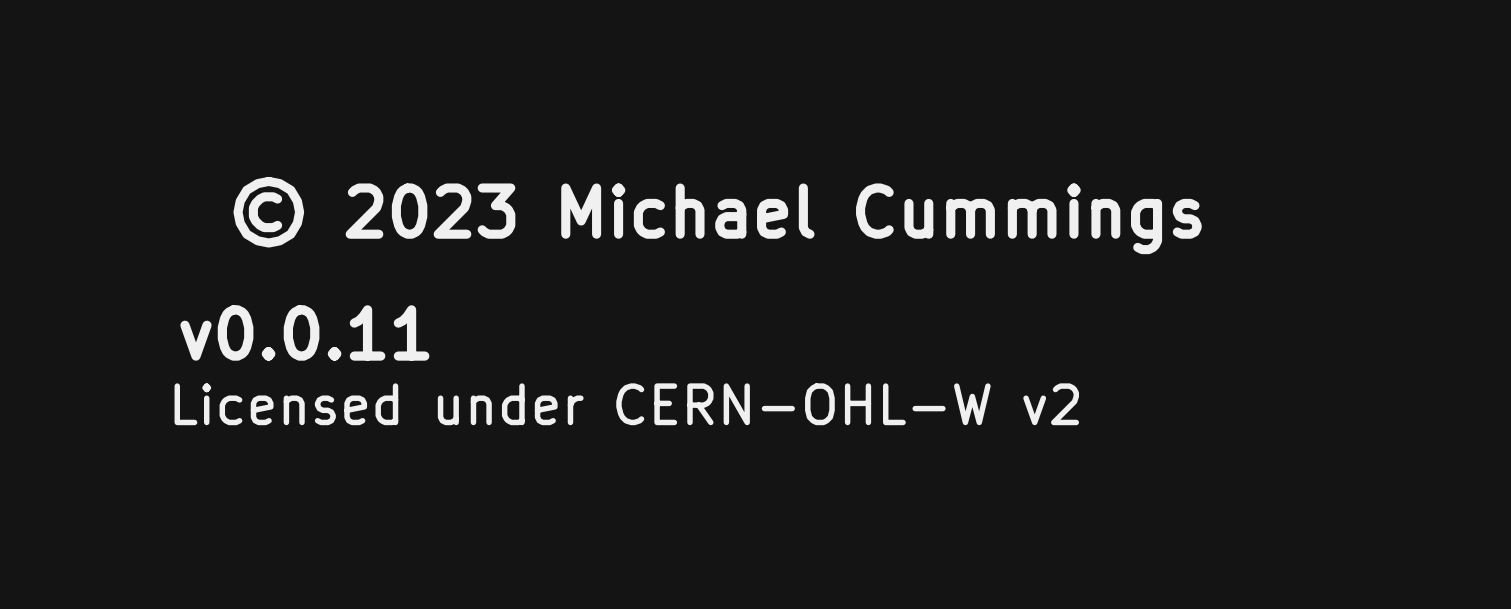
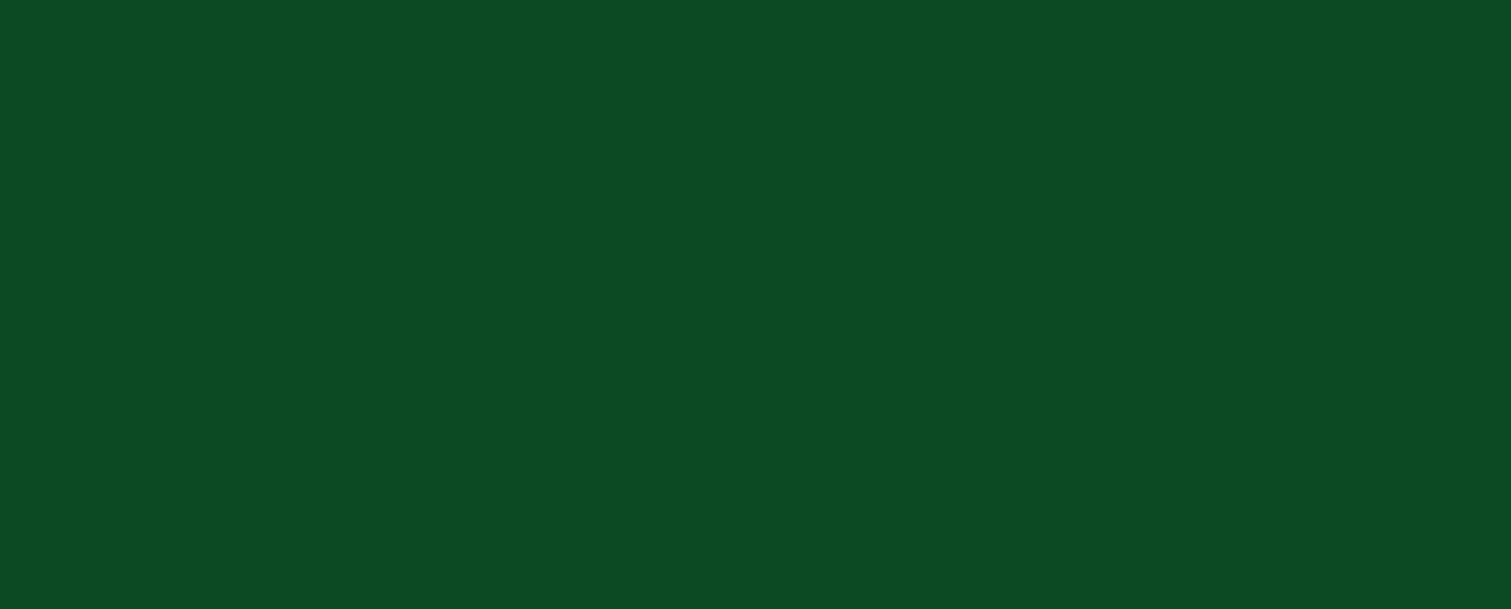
text: © 2023 Michael Cummings (717, 215) -> none
text: v0.0.11 (304, 332) -> none
text: Licensed under CERN-OHL-W v2 (626, 404) -> none

